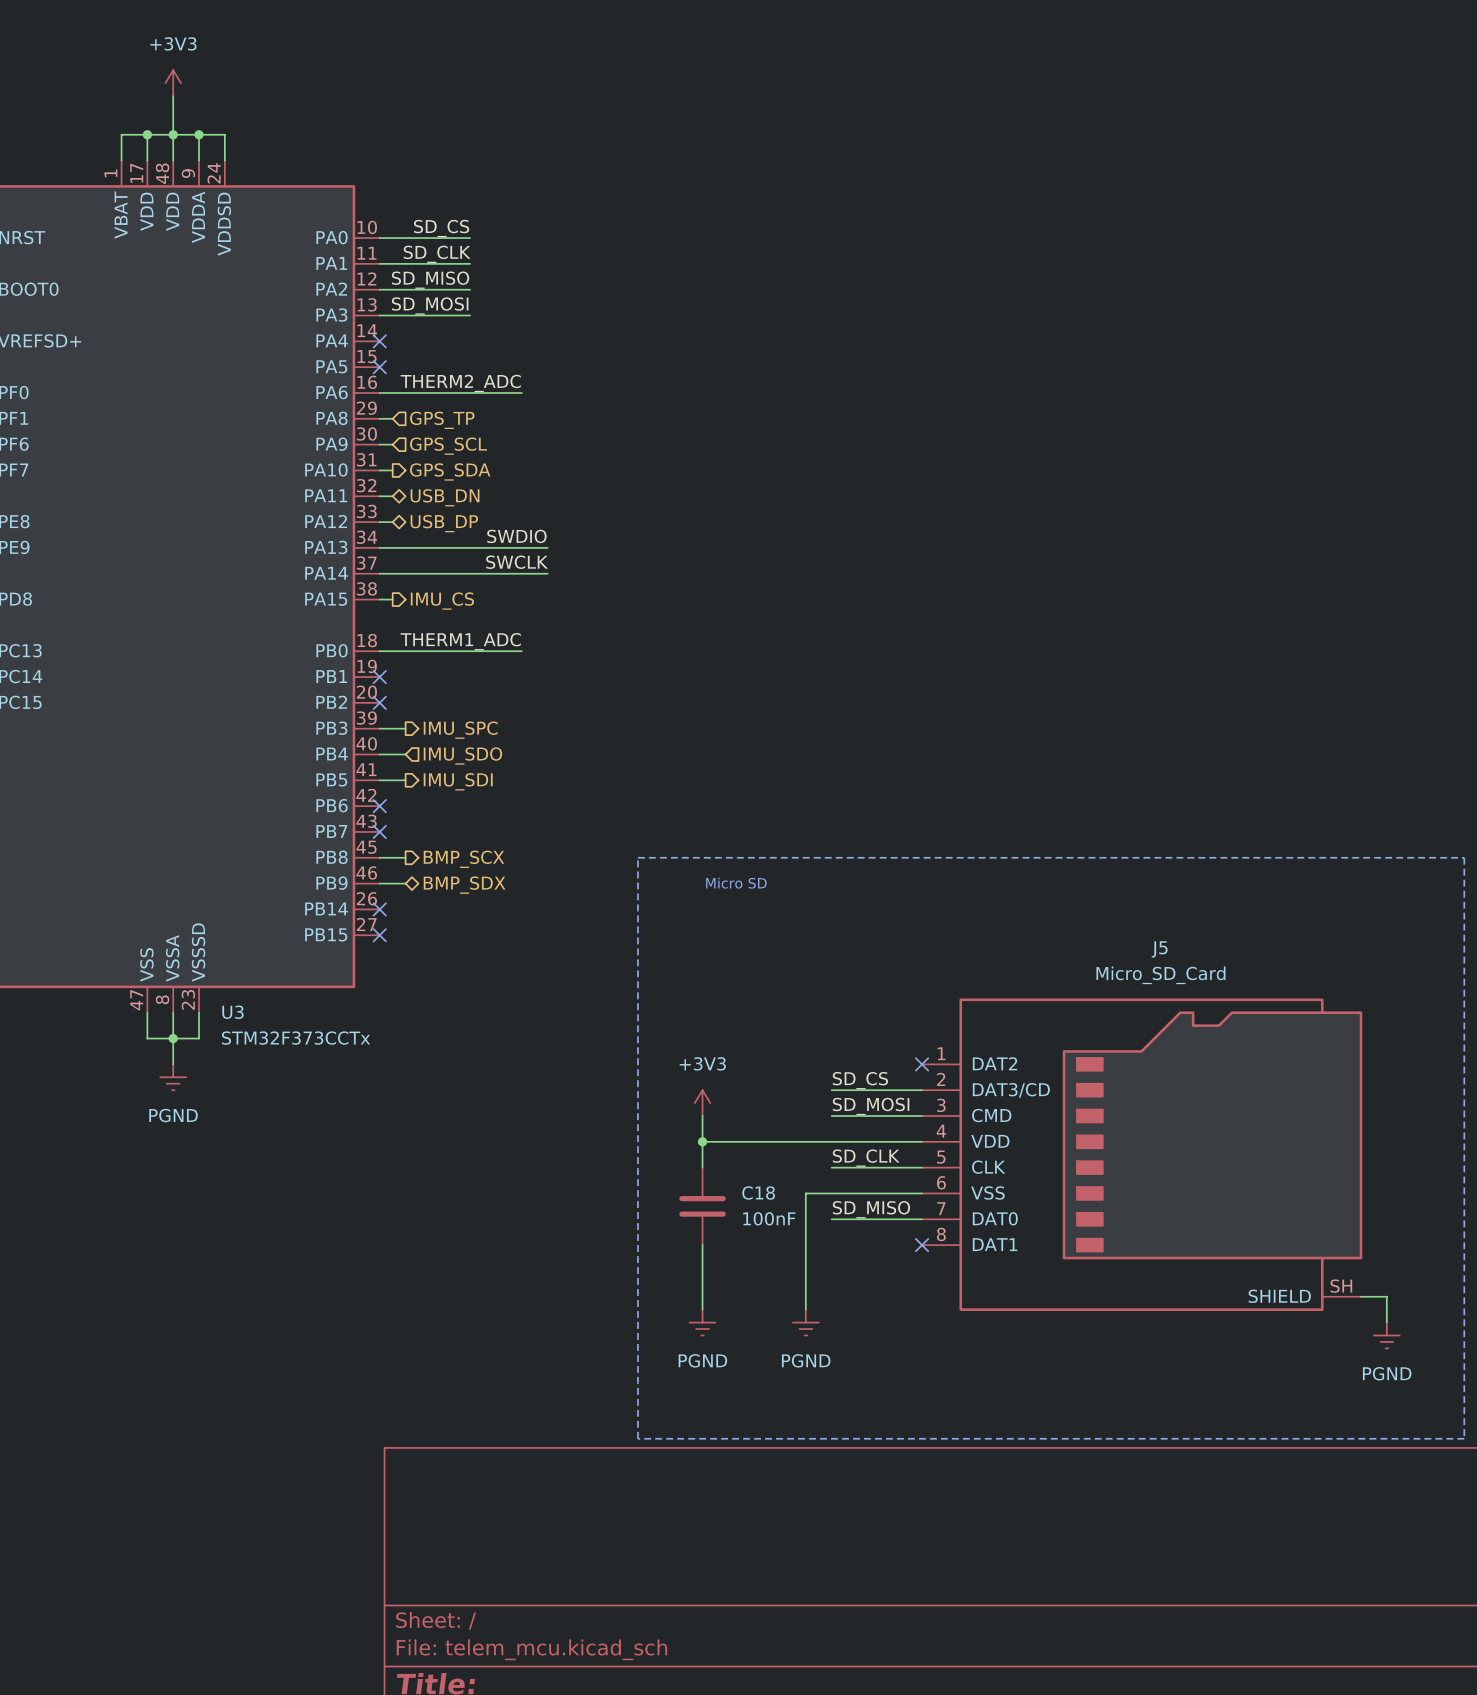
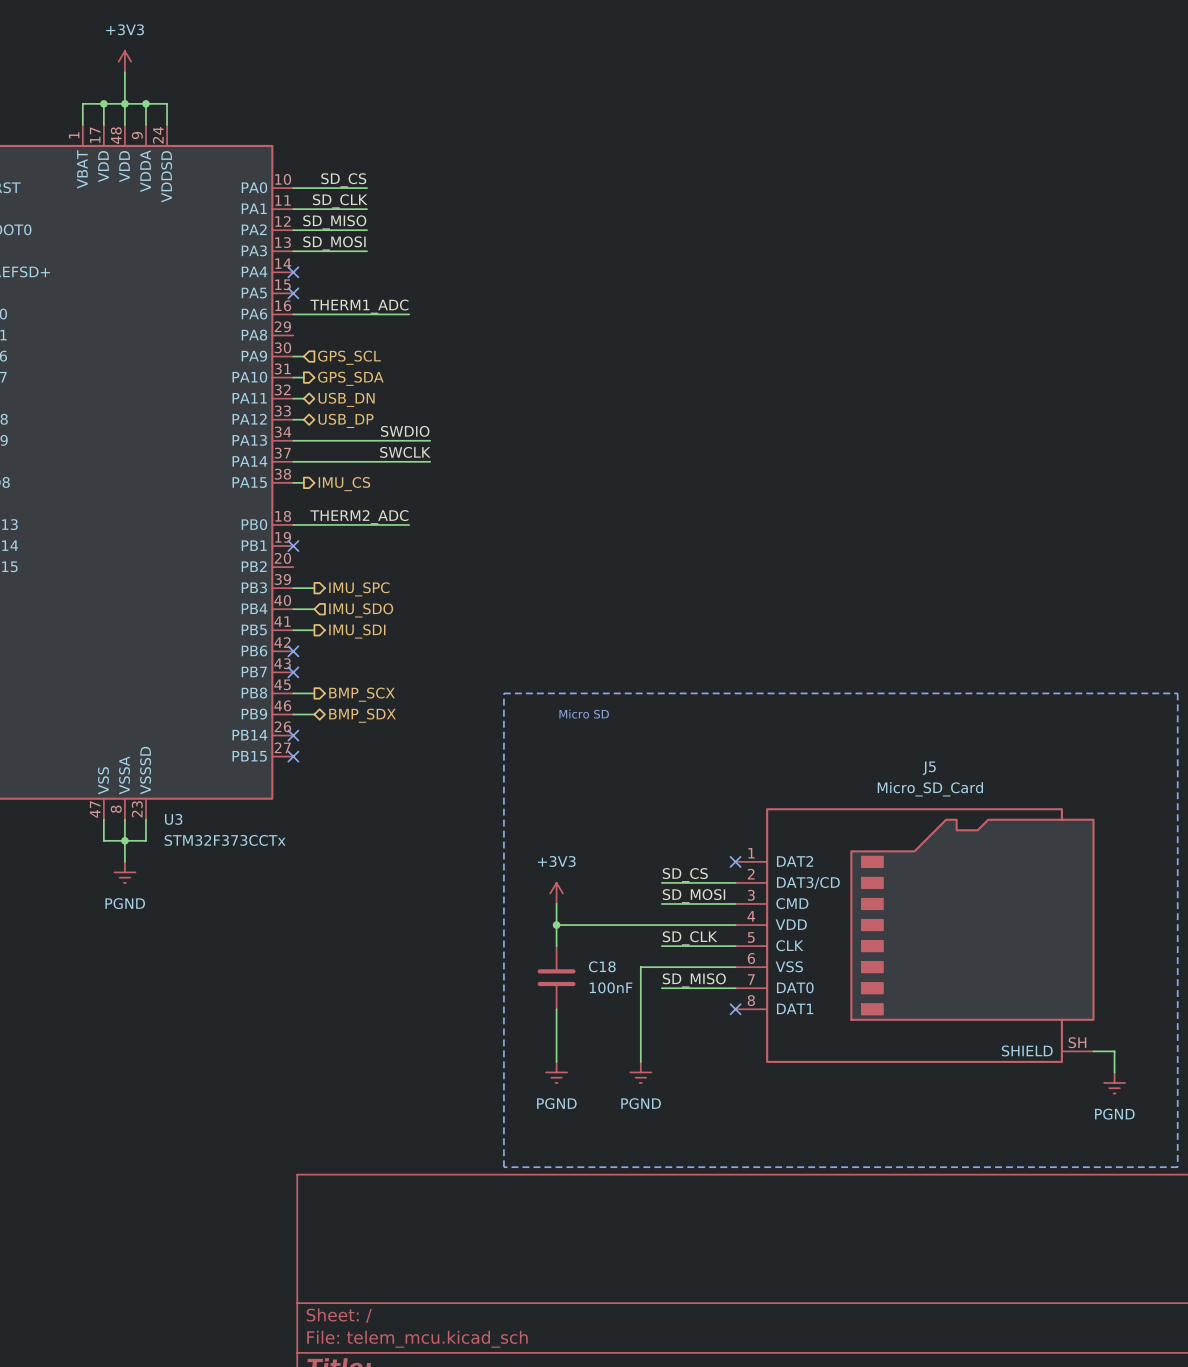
label: THERM2_ADC (460, 383) -> THERM1_ADC (359, 306)
wire: (379, 418) (392, 418) -> none
hierarchical label: GPS_TP (442, 420) -> none
label: THERM1_ADC (460, 641) -> THERM2_ADC (359, 517)
no-connect mark: (379, 702) -> none

